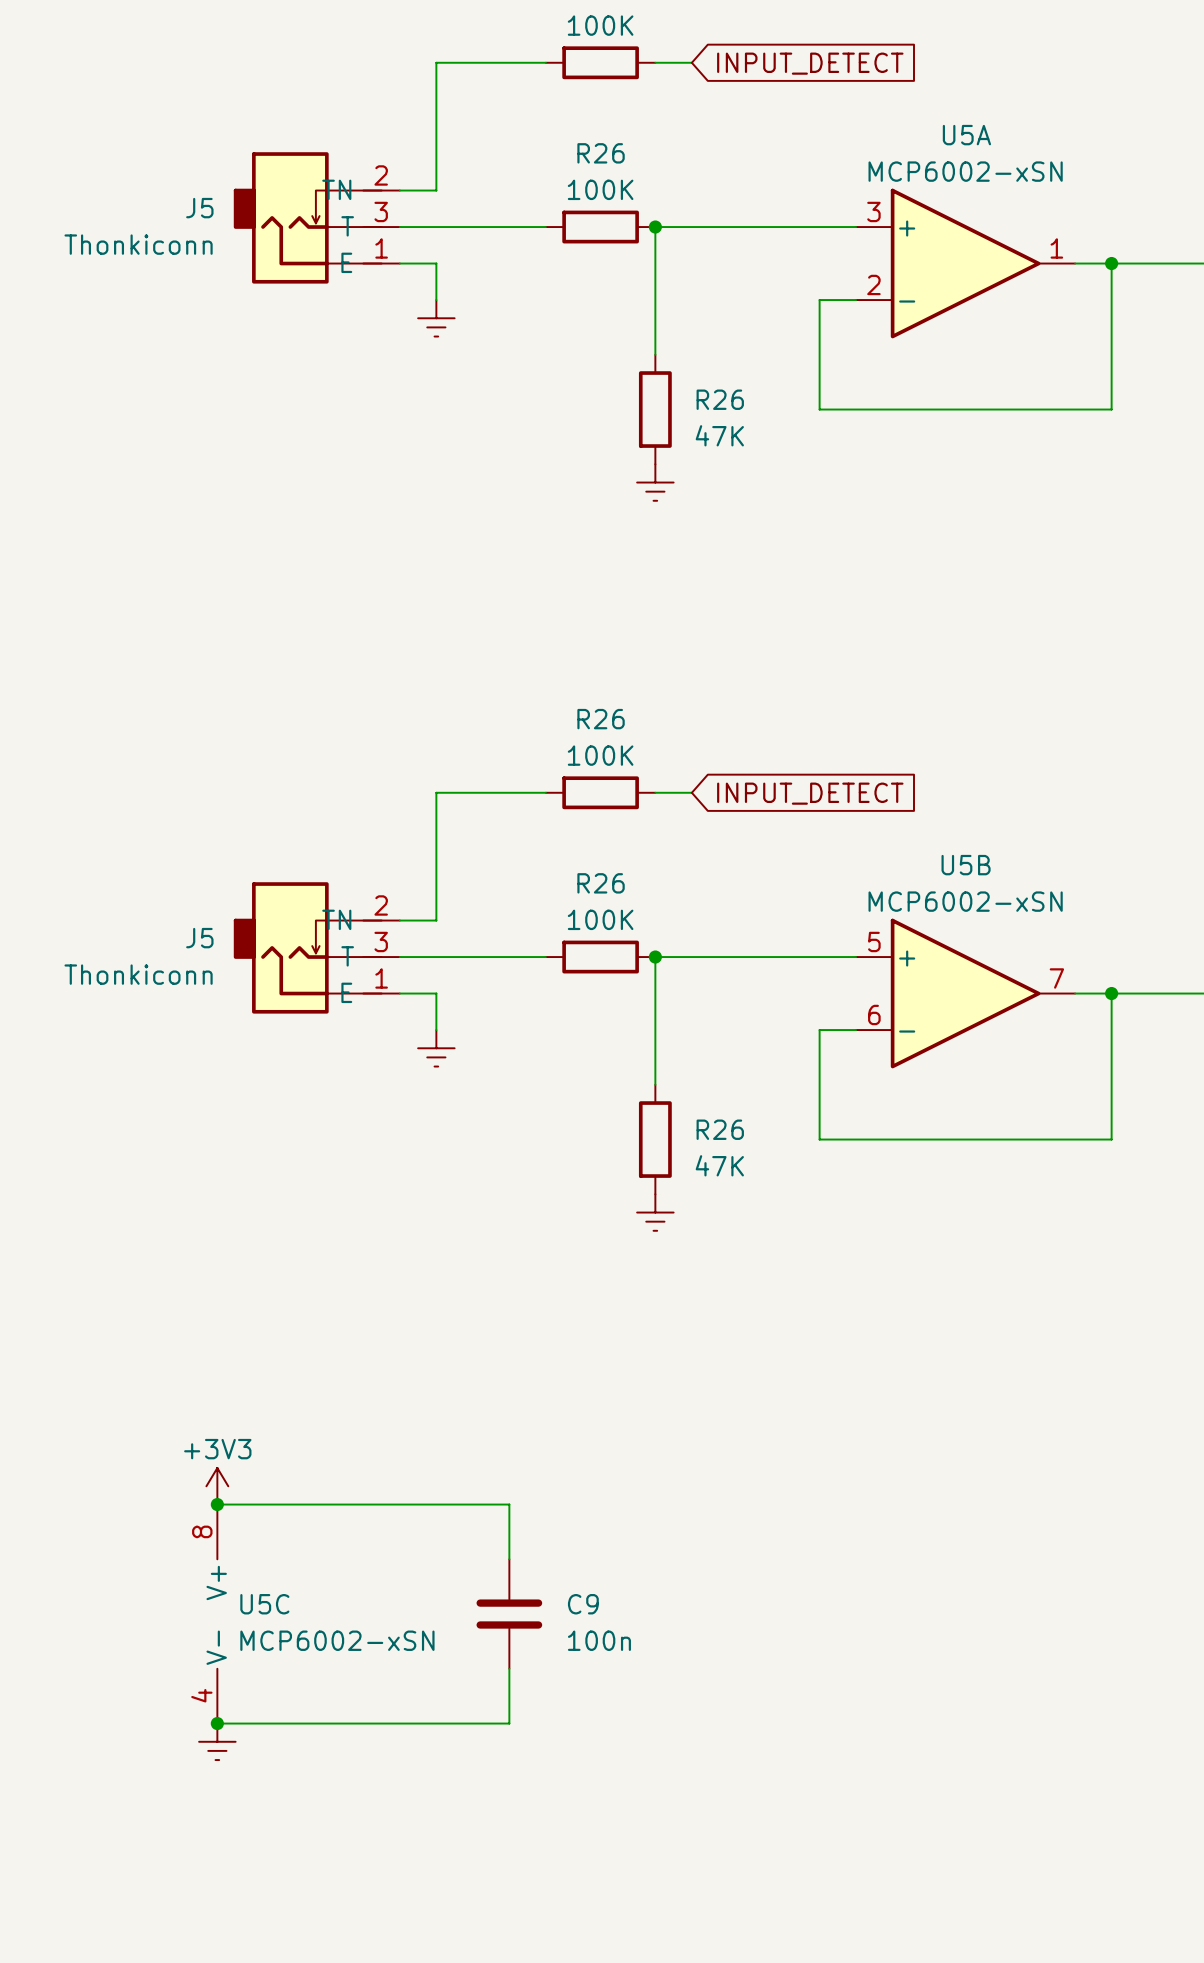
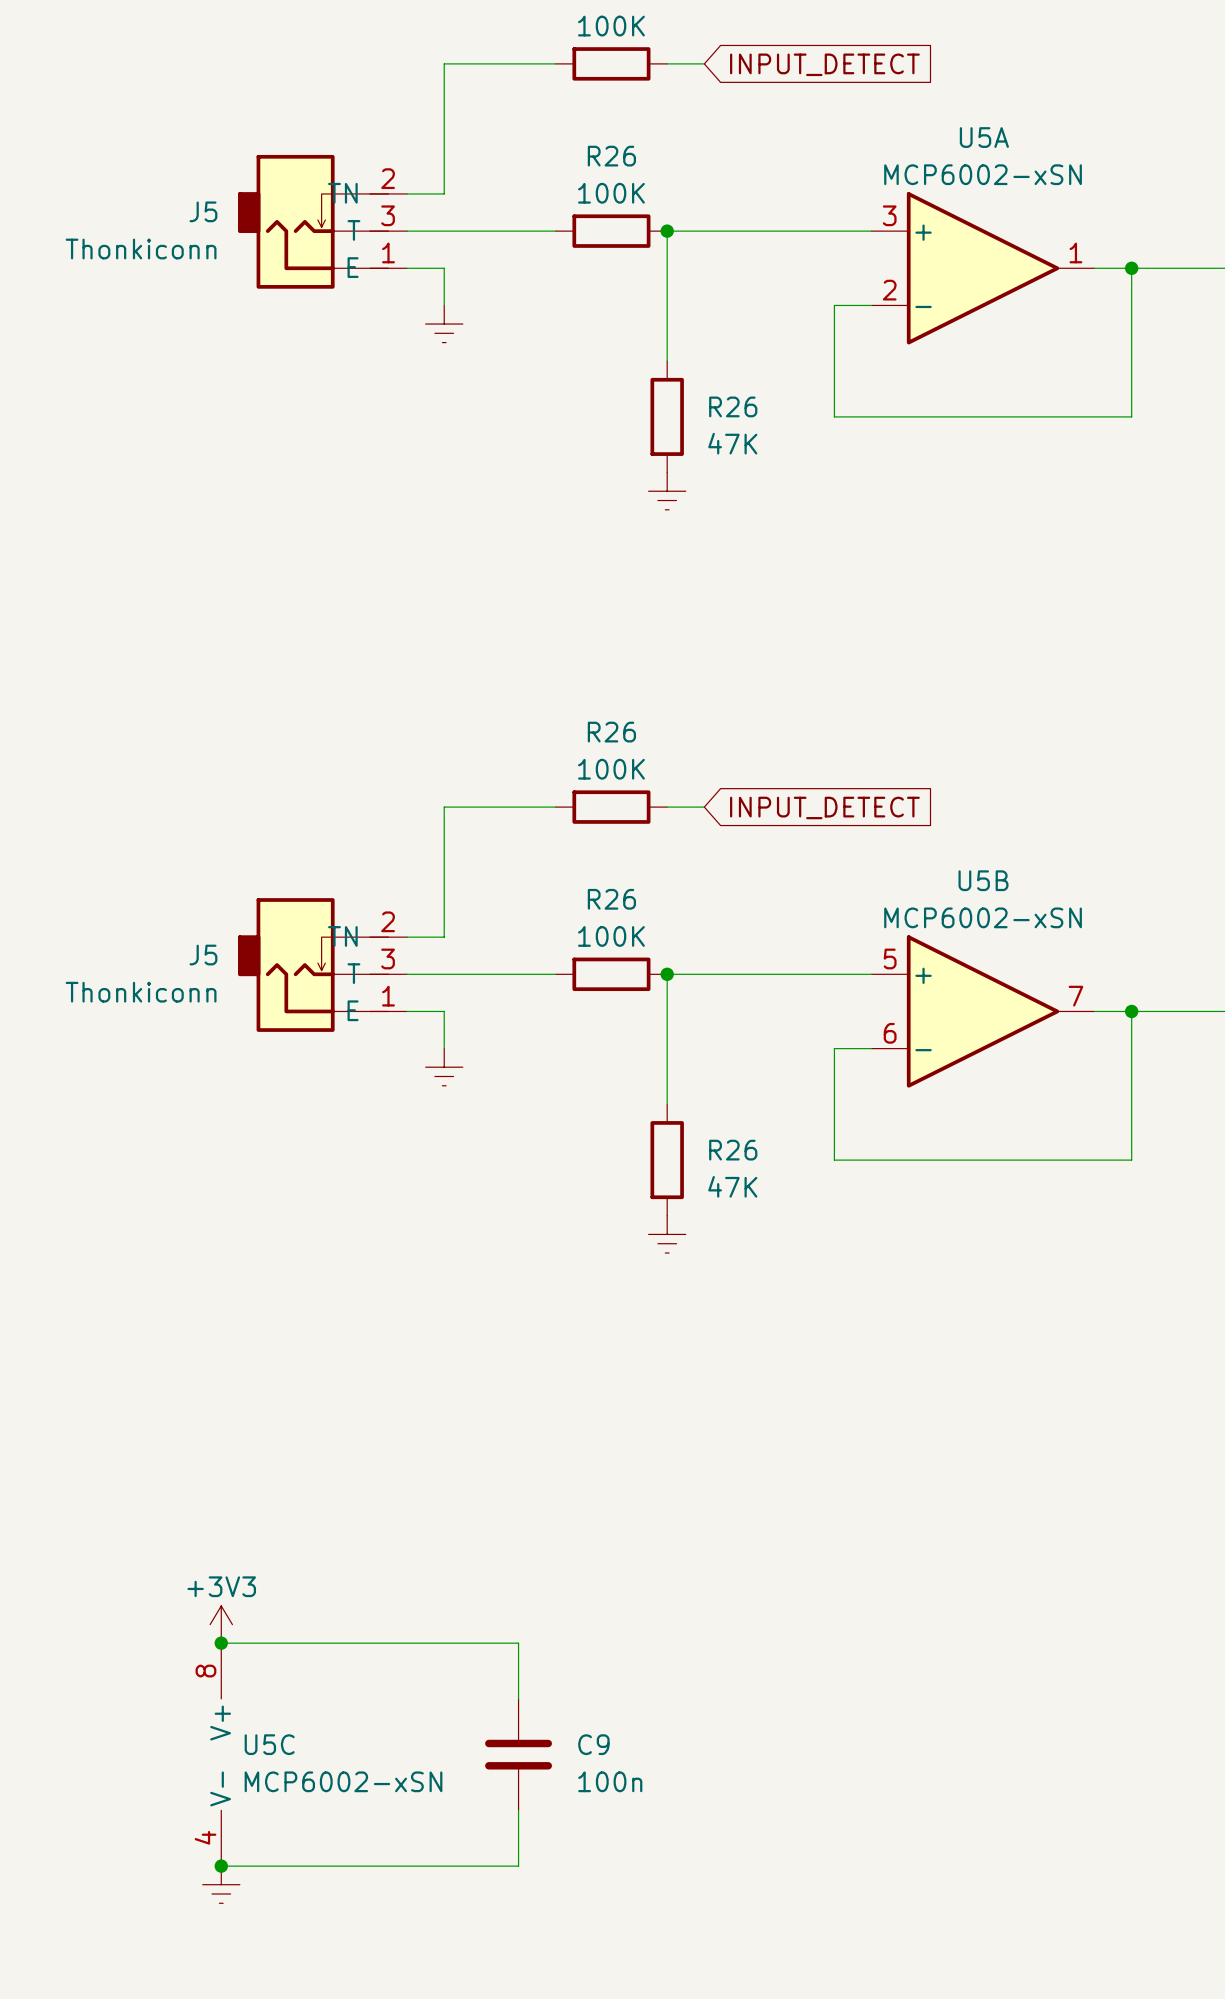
power symbol position: +3V3 (217, 1486) -> +3V3 (221, 1624)
wire: (217, 1504) (509, 1504) (509, 1559) -> none
junction: (217, 1504) -> none
junction: none -> (221, 1643)
U5C position: (217, 1614) -> (221, 1754)
C9 position: (509, 1614) -> (518, 1754)
wire: (509, 1668) (509, 1723) (217, 1723) -> (518, 1698) (518, 1643) (221, 1643)
junction: (217, 1723) -> none
power symbol position: (217, 1741) -> (221, 1884)
wire: none -> (518, 1810) (518, 1866) (221, 1866)
junction: none -> (221, 1866)

